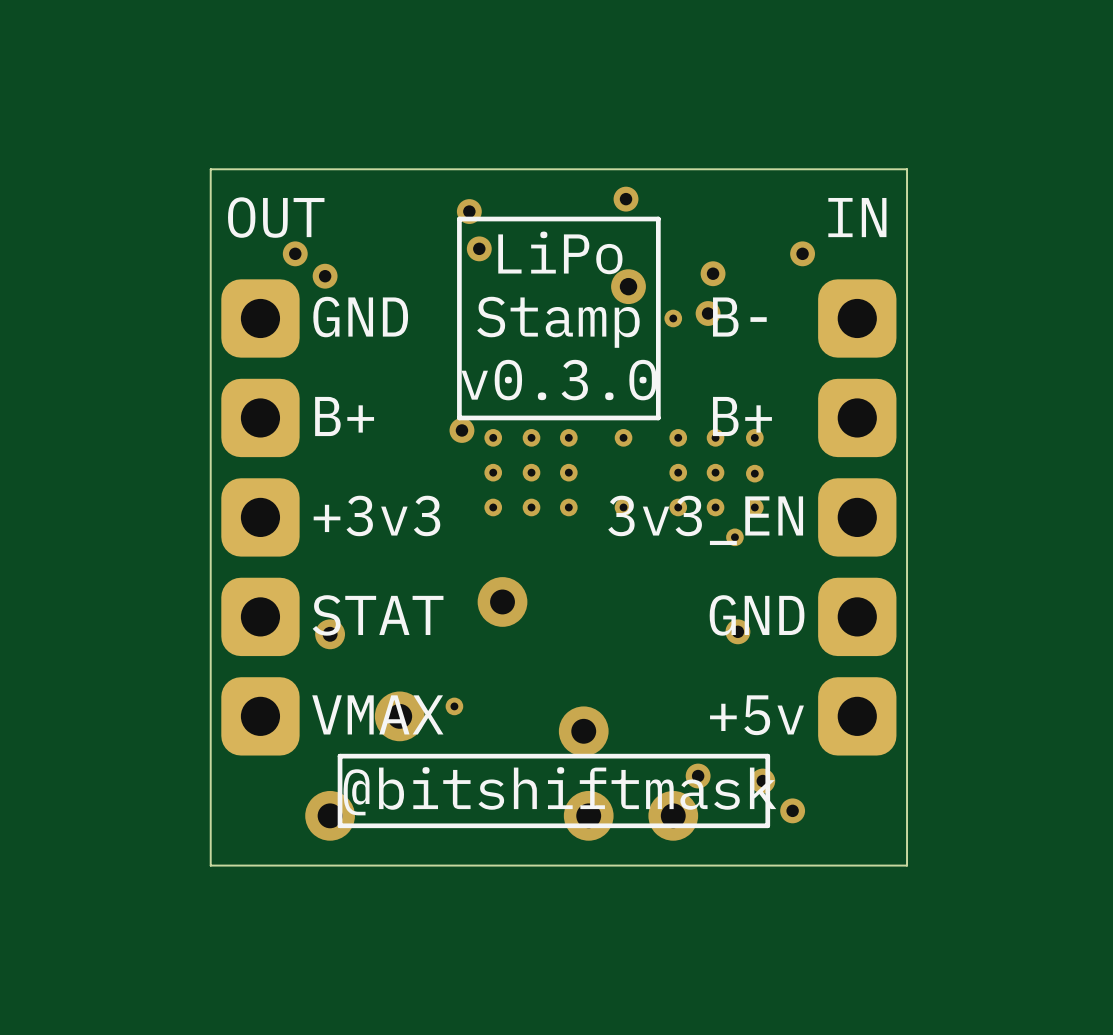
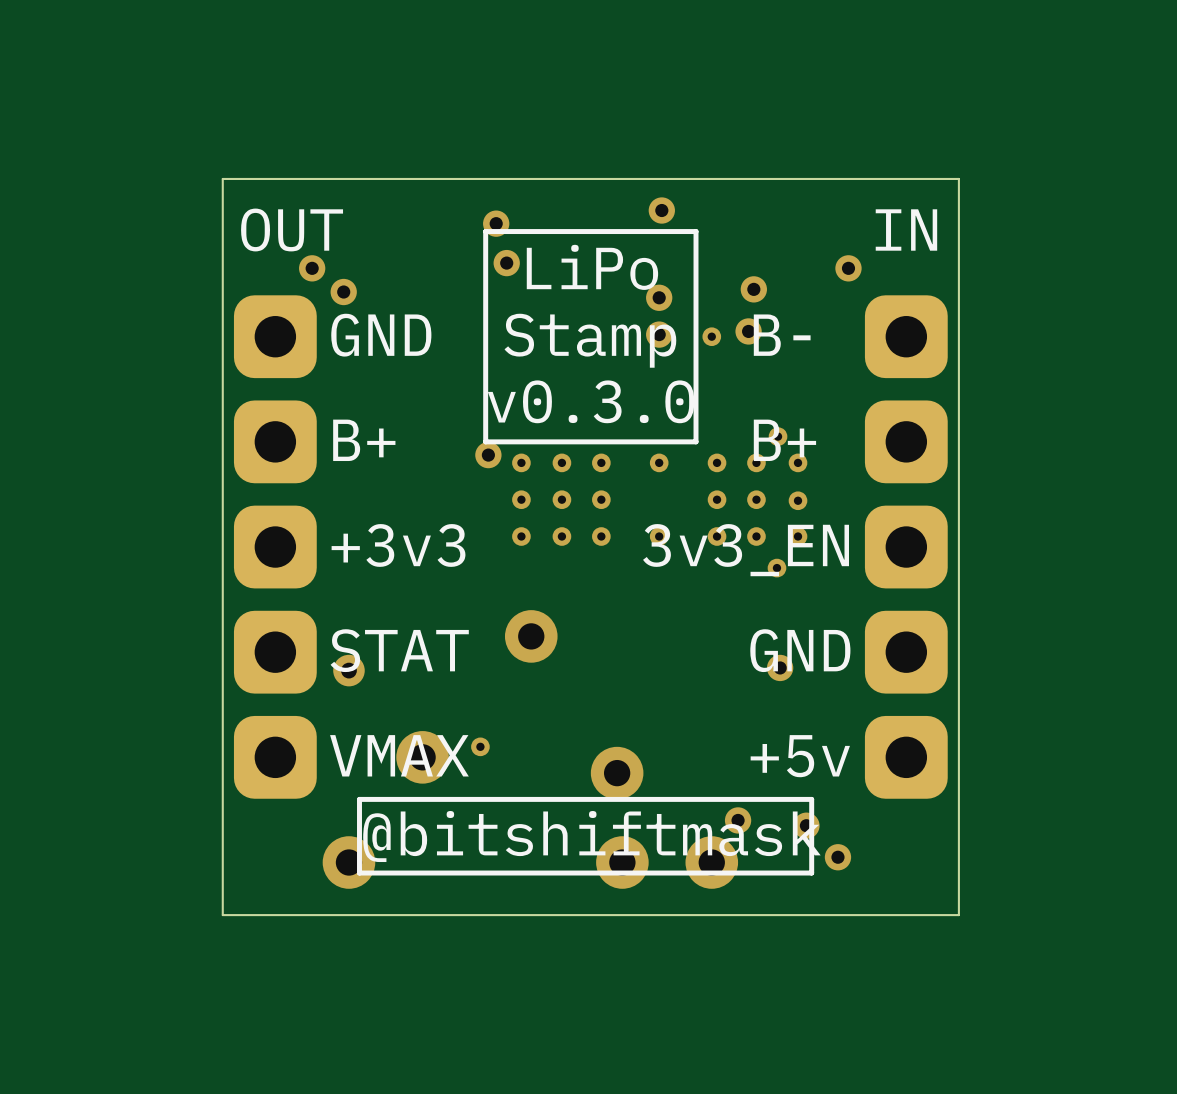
via size: [611, 269, 646, 305] -> [646, 284, 673, 311]
via: none -> (659, 334)
via: none -> (778, 436)

